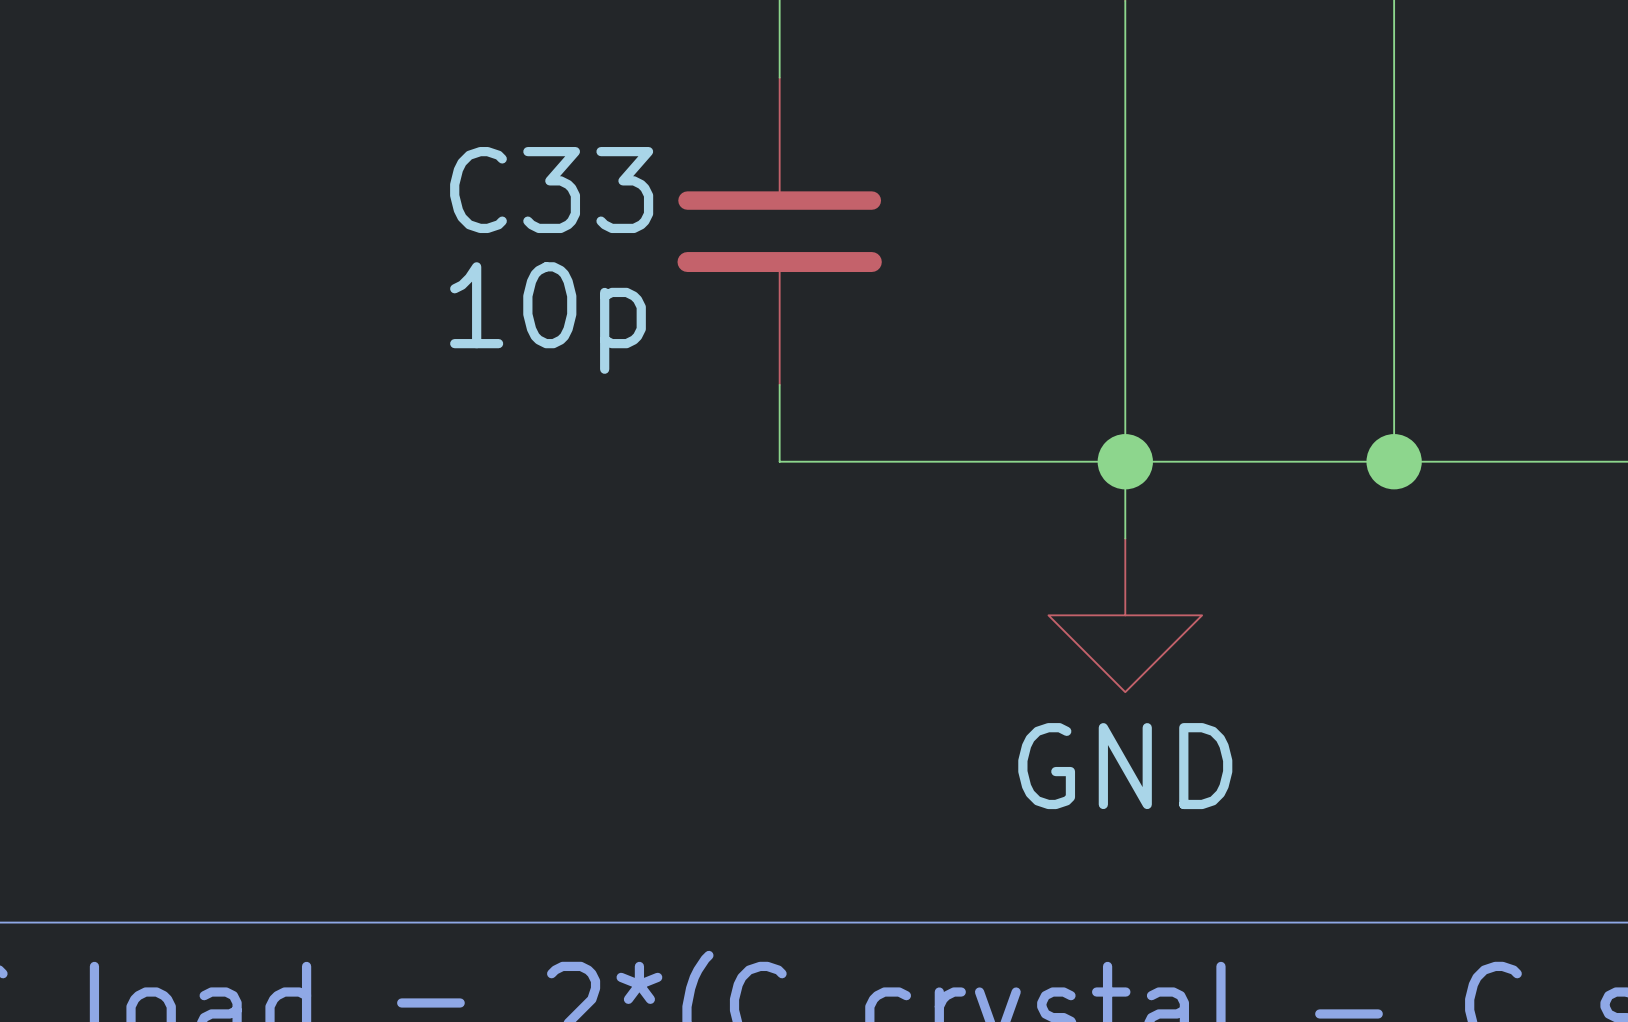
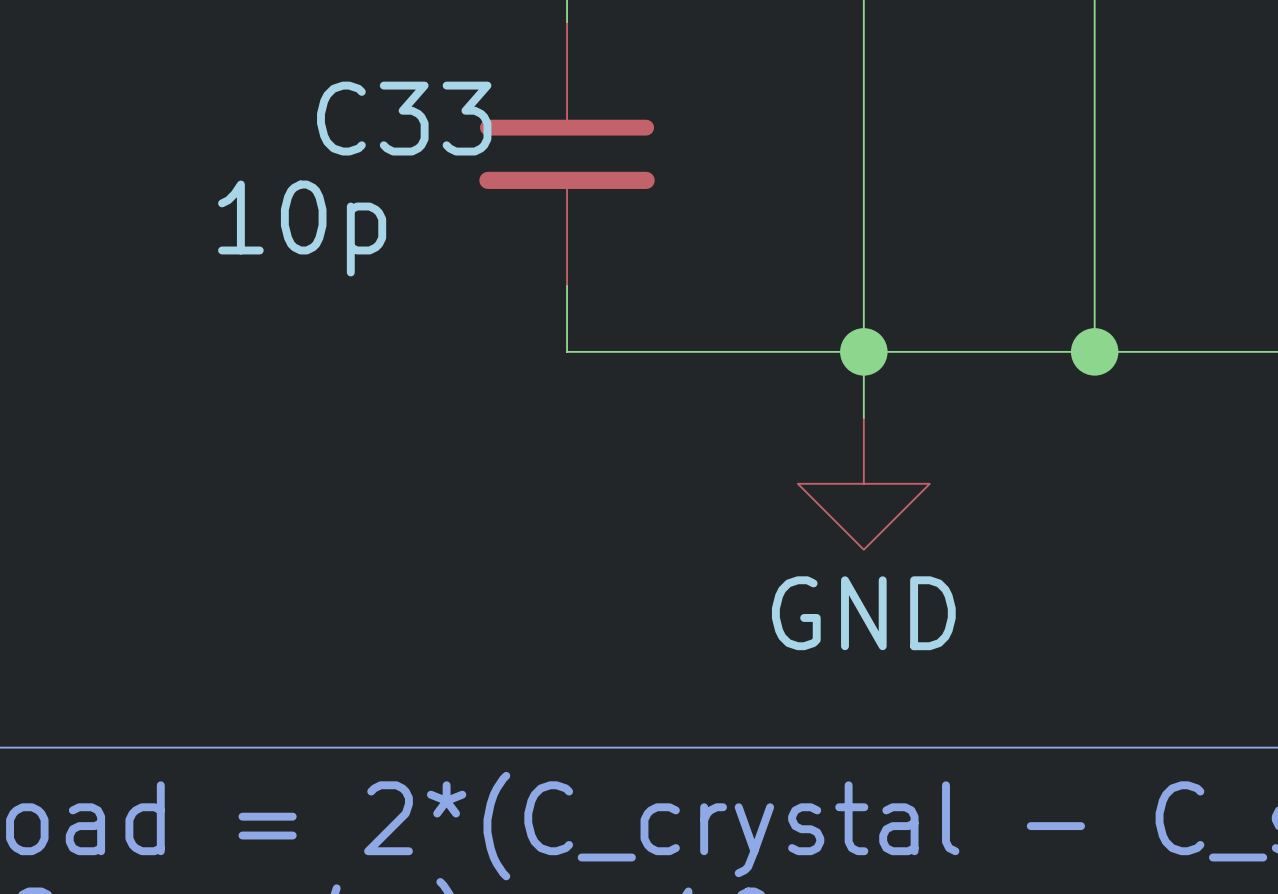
C33 name position: C33 (551, 190) -> C33 (404, 118)
C33 value position: 10p (547, 318) -> 10p (302, 228)

